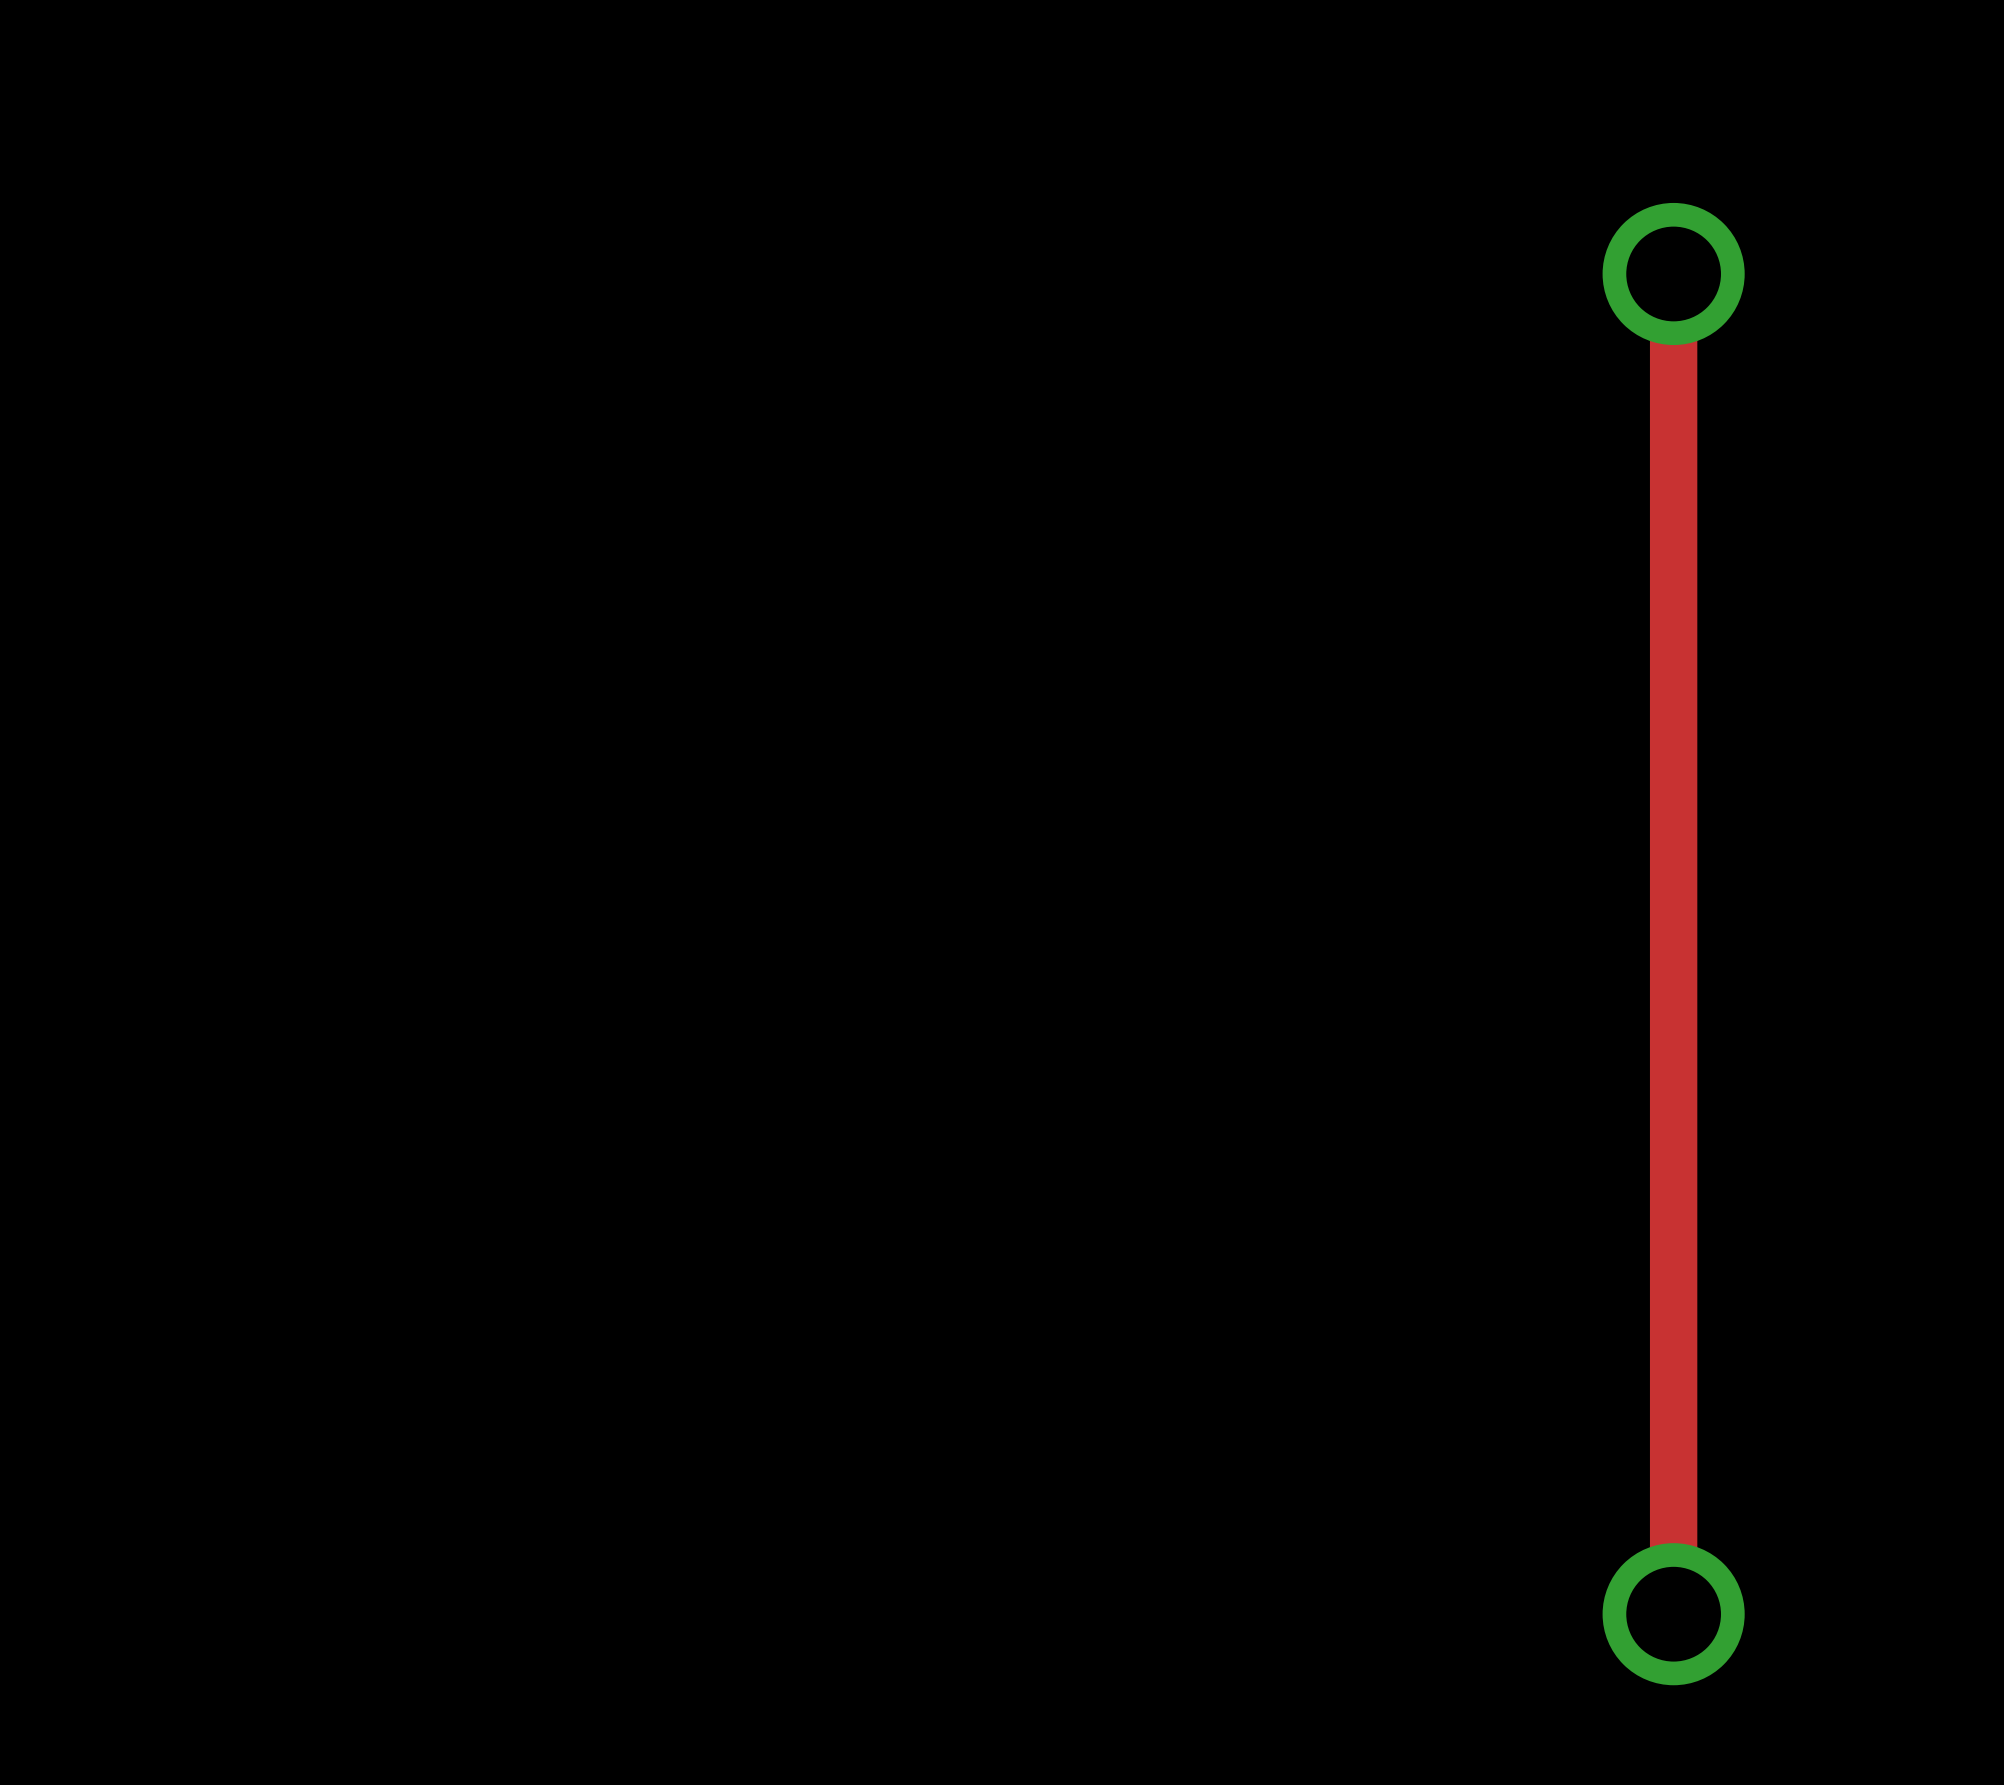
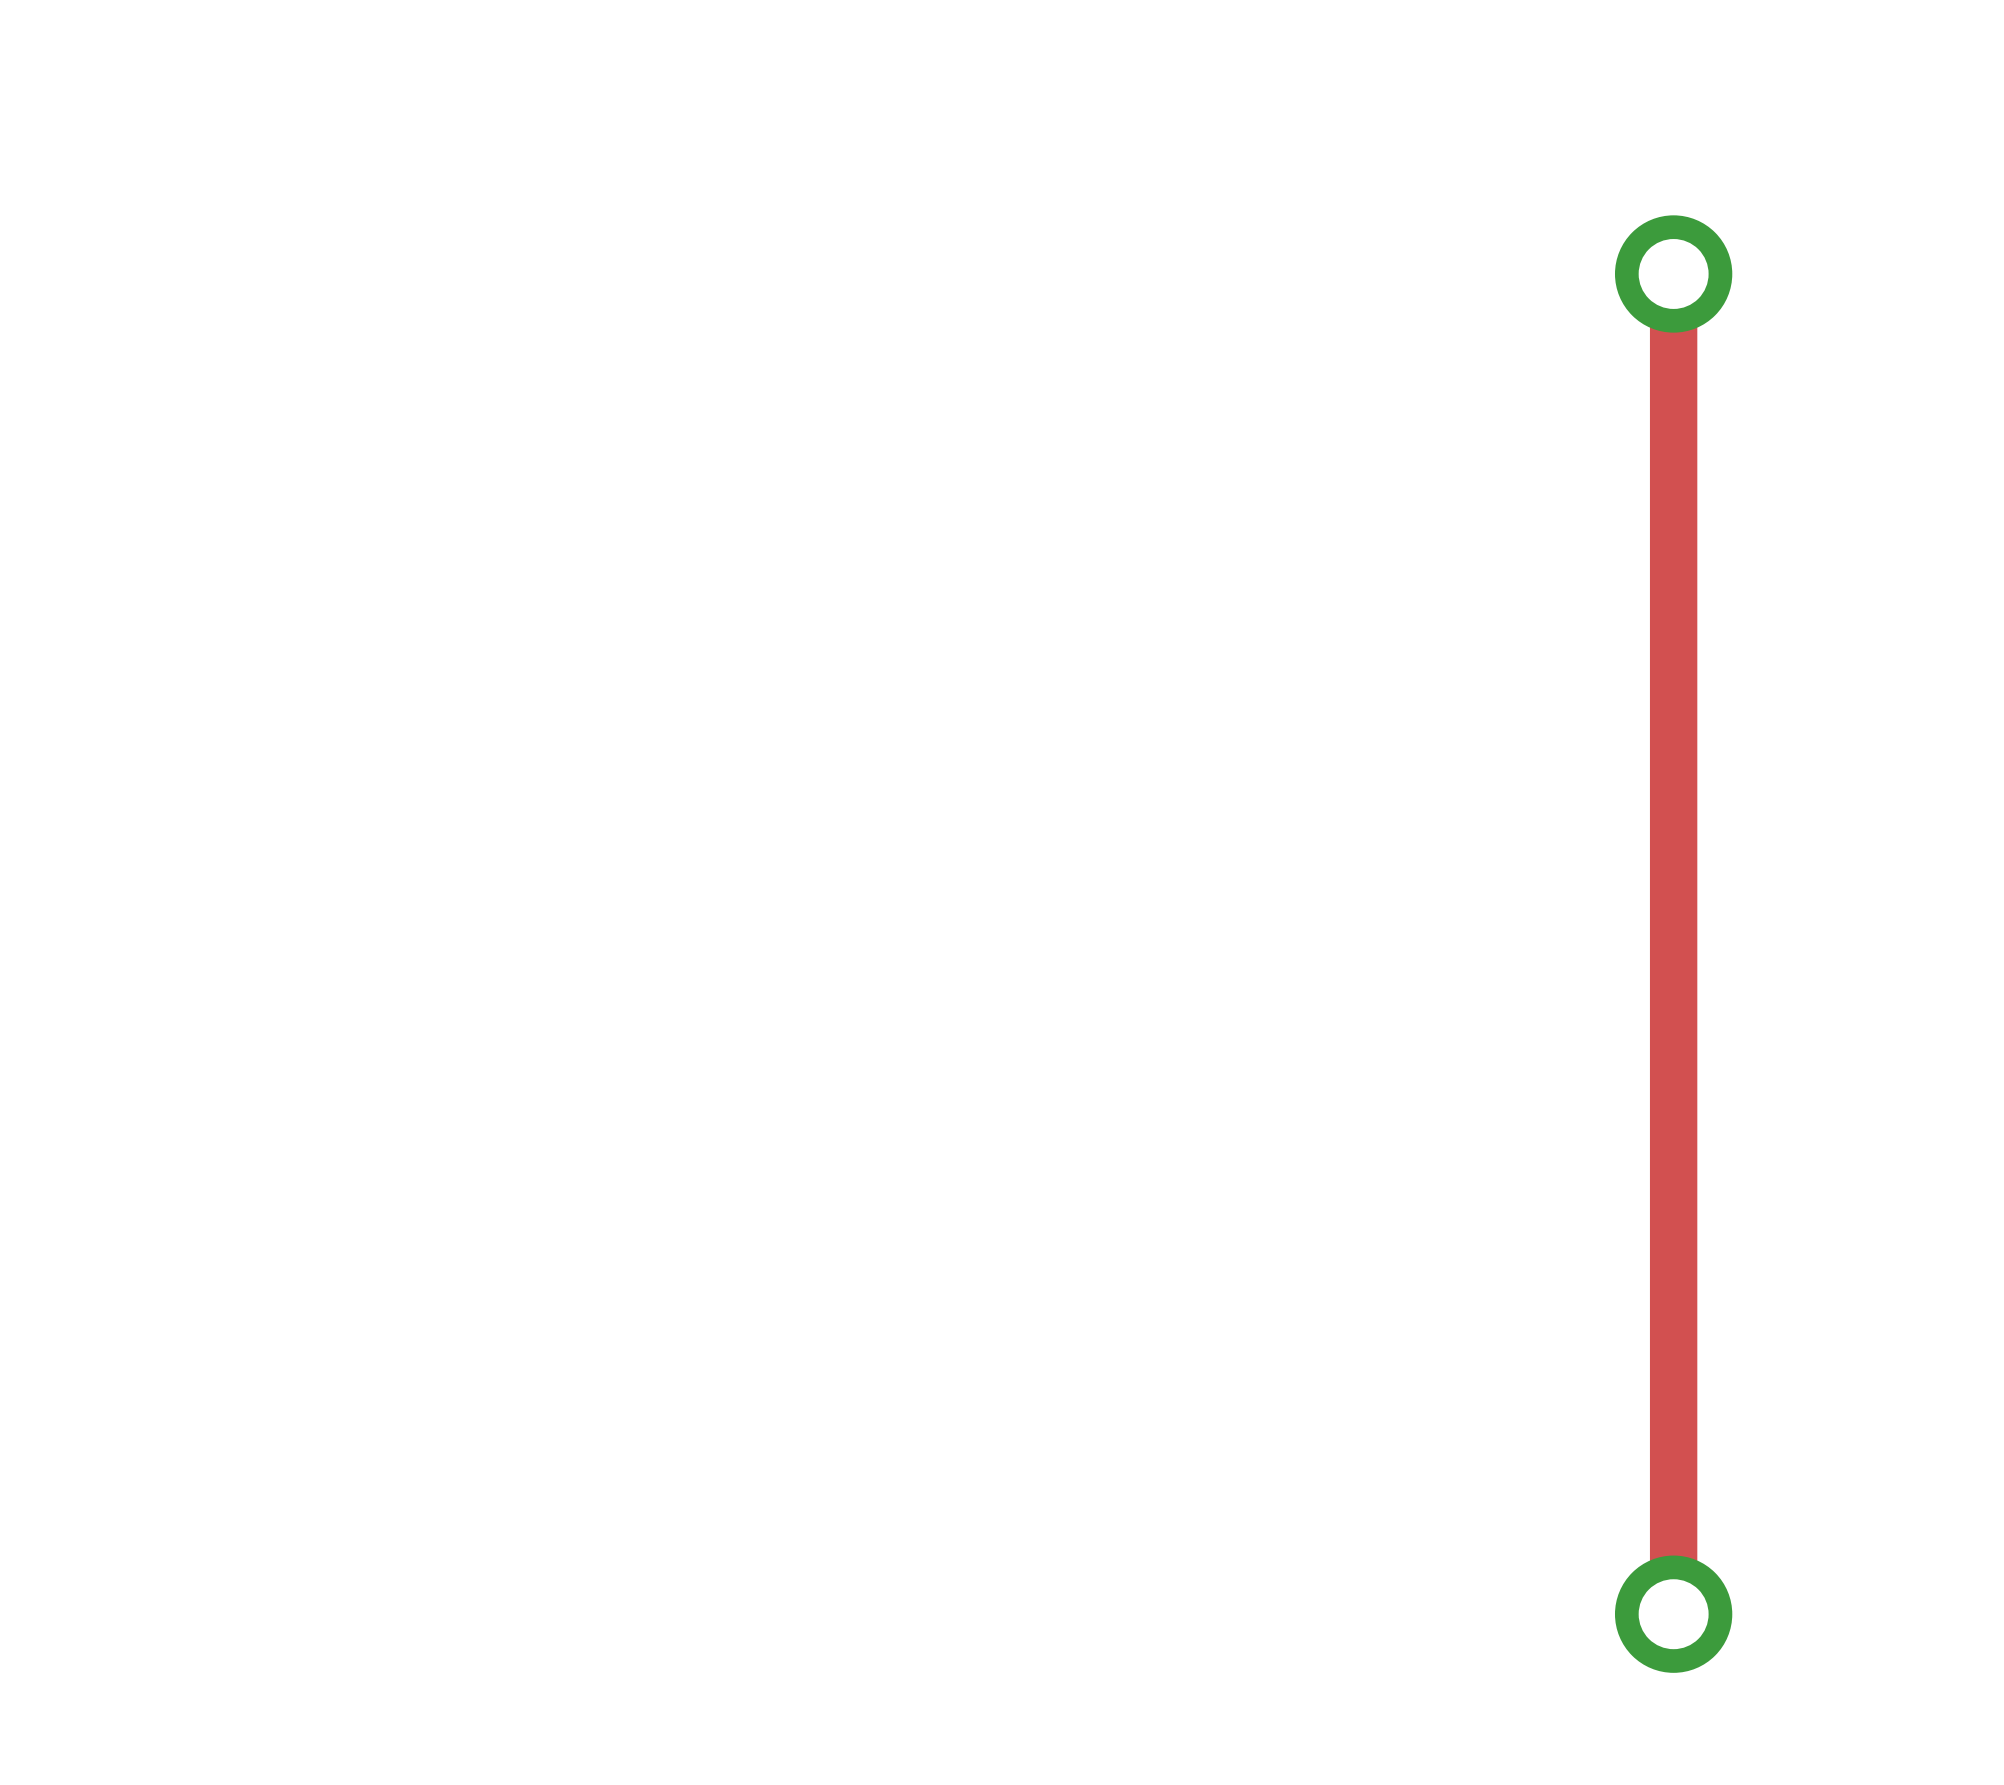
via size: [1602, 202, 1745, 346] -> [1614, 215, 1733, 333]
via size: [1602, 1543, 1745, 1686] -> [1614, 1555, 1733, 1673]

